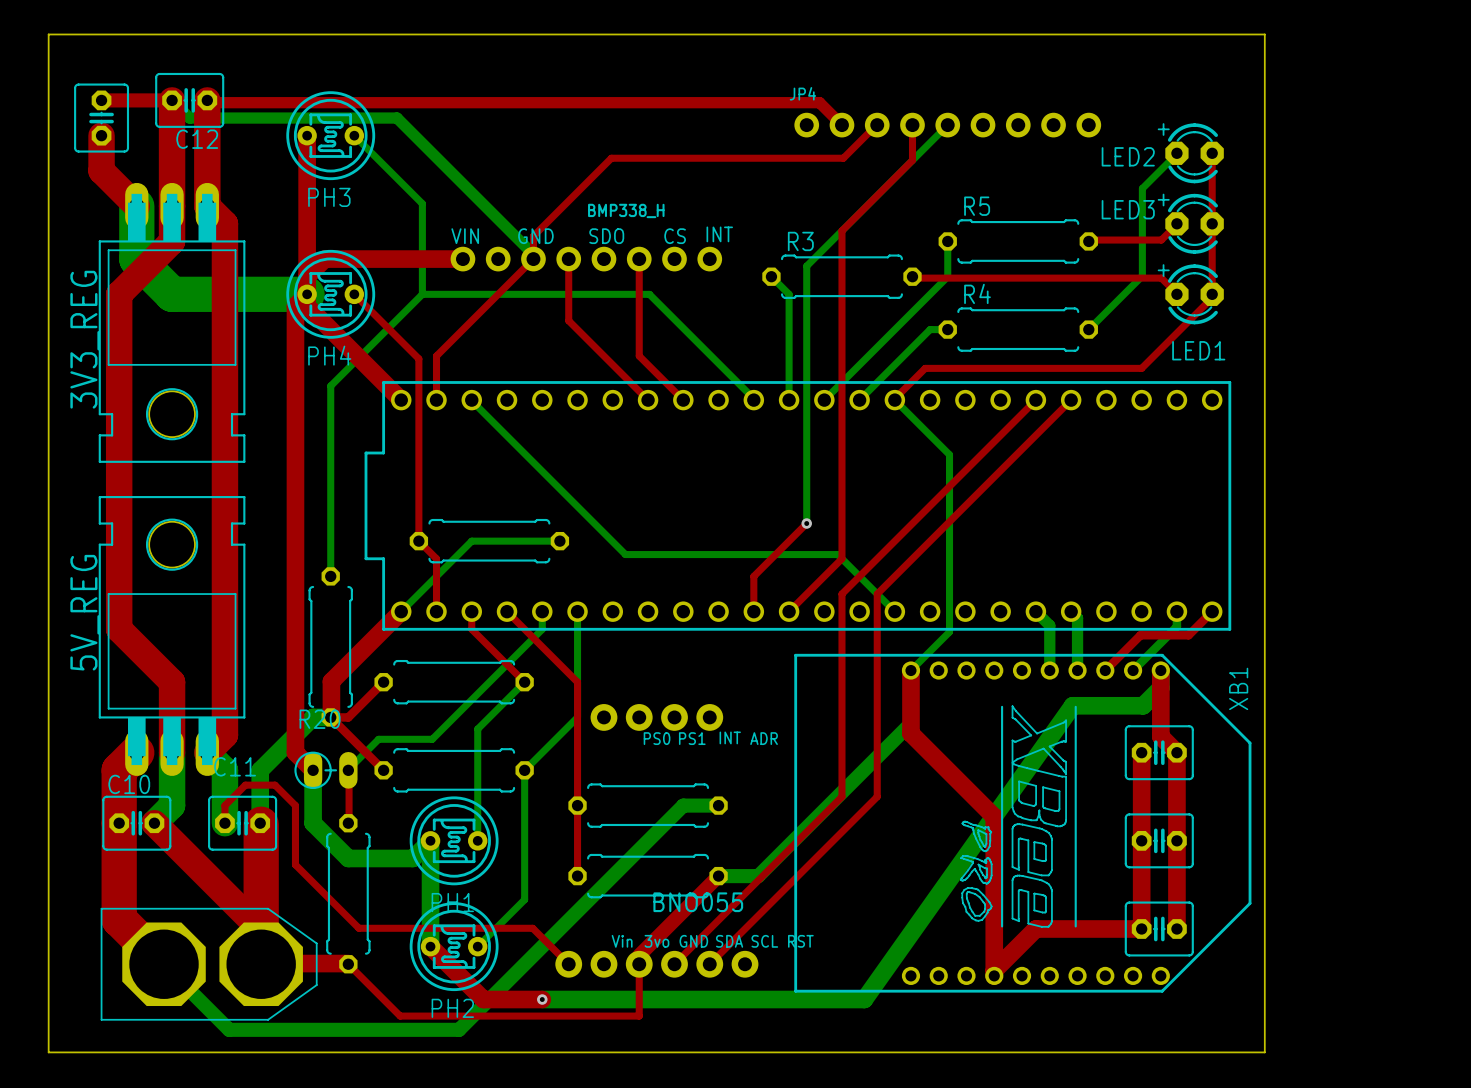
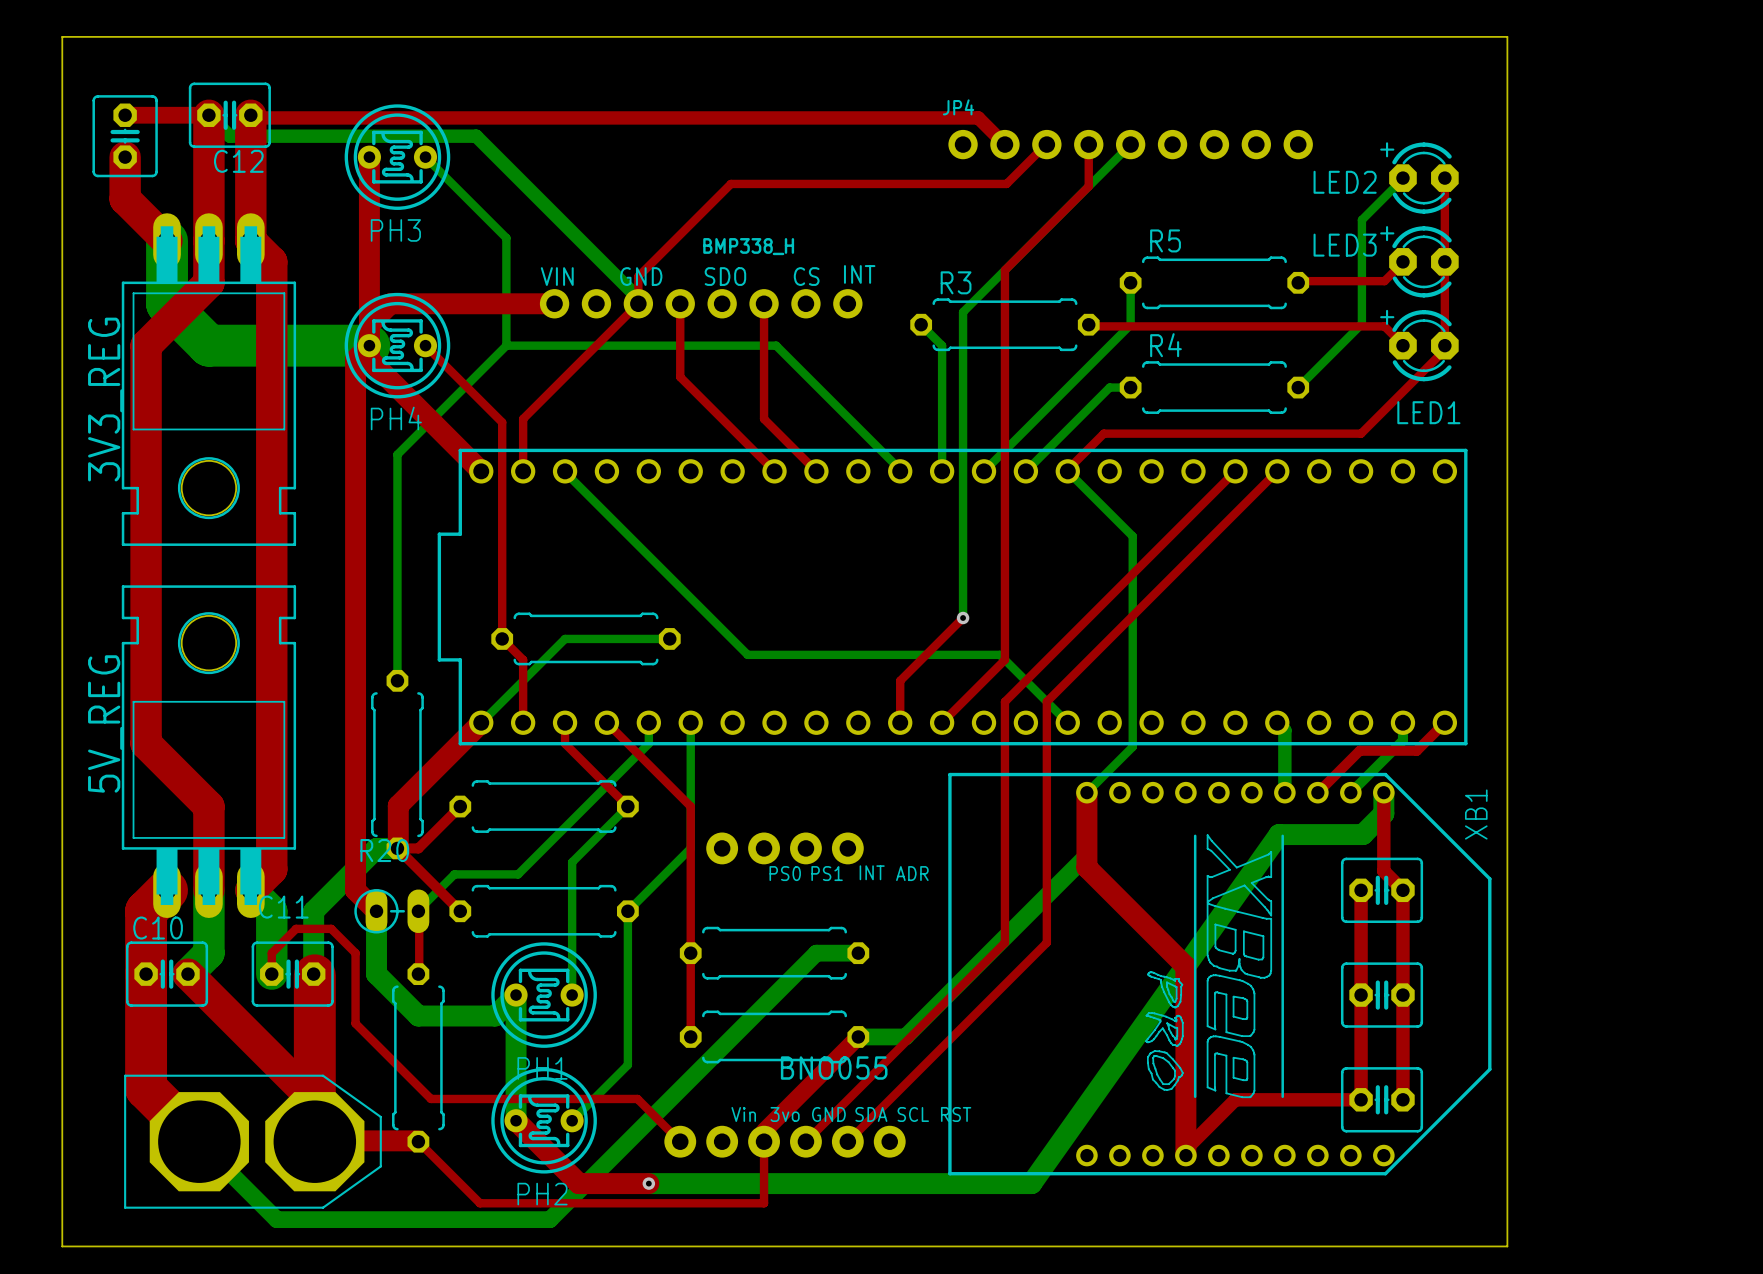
bottom track: (1035, 611) (1049, 625) (1049, 670) -> none
top track width: thick (1160, 670) (1160, 736) (1176, 752) (1176, 928) -> thin (1383, 792) (1383, 871) (1402, 890) (1402, 1099)
top track width: thick (1141, 752) (1141, 928) (1035, 928) (994, 970) -> thin (1361, 890) (1361, 1099) (1235, 1099) (1185, 1149)

